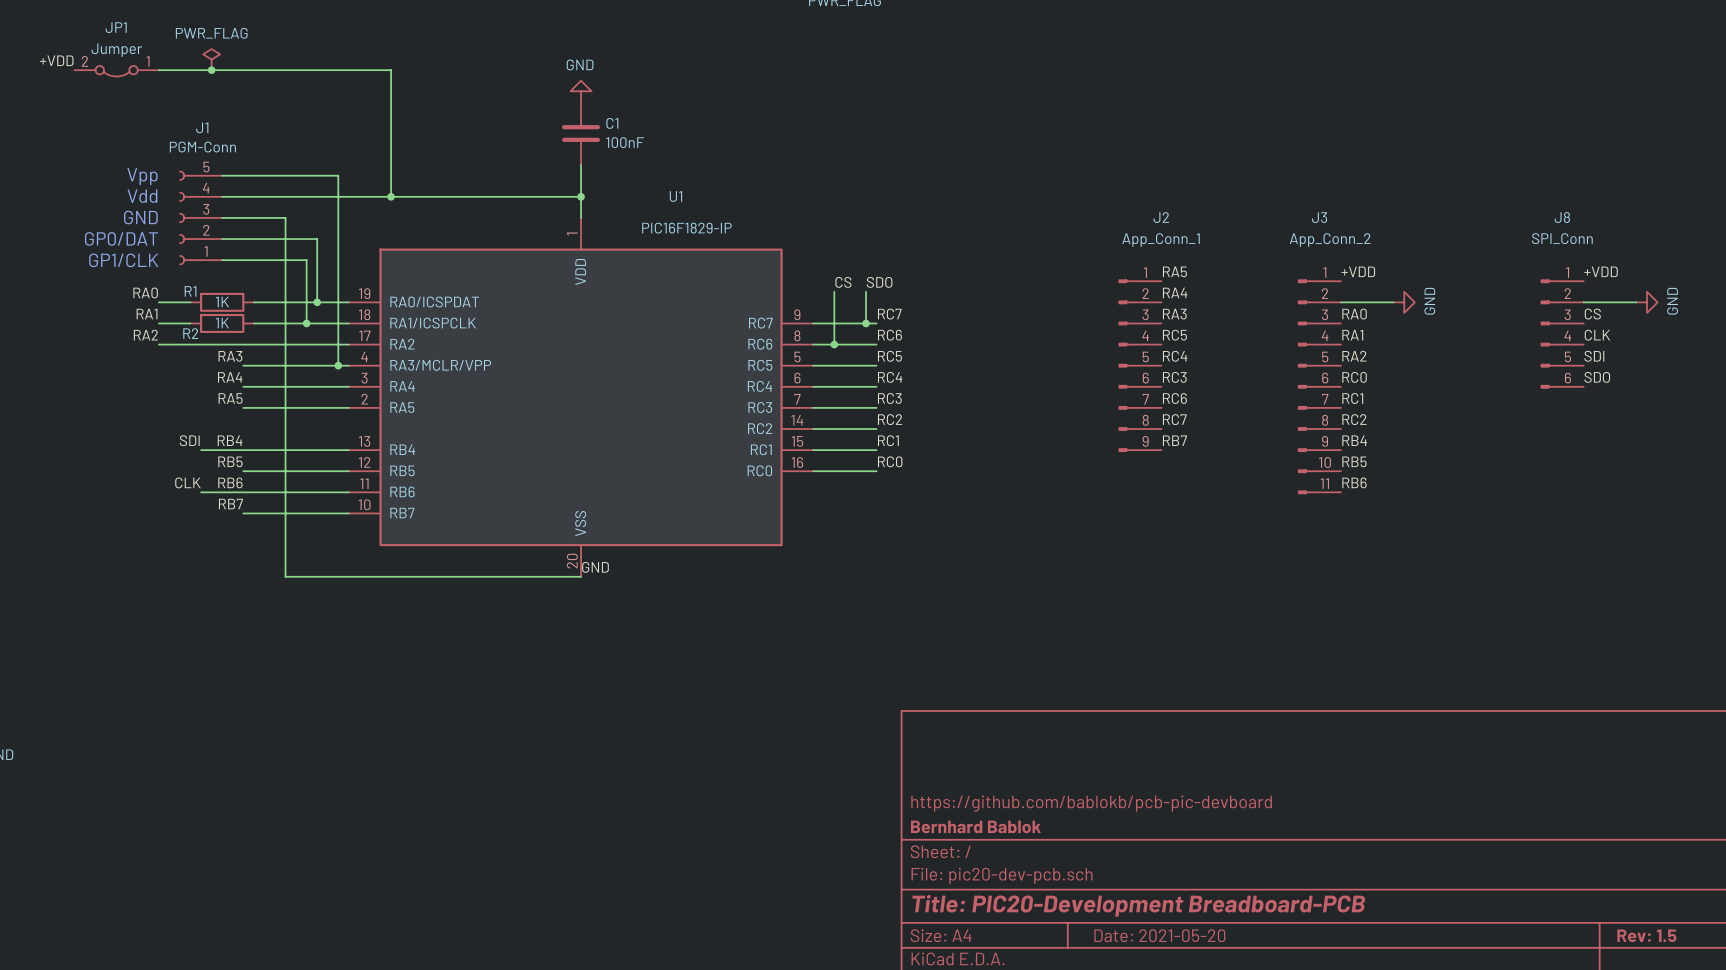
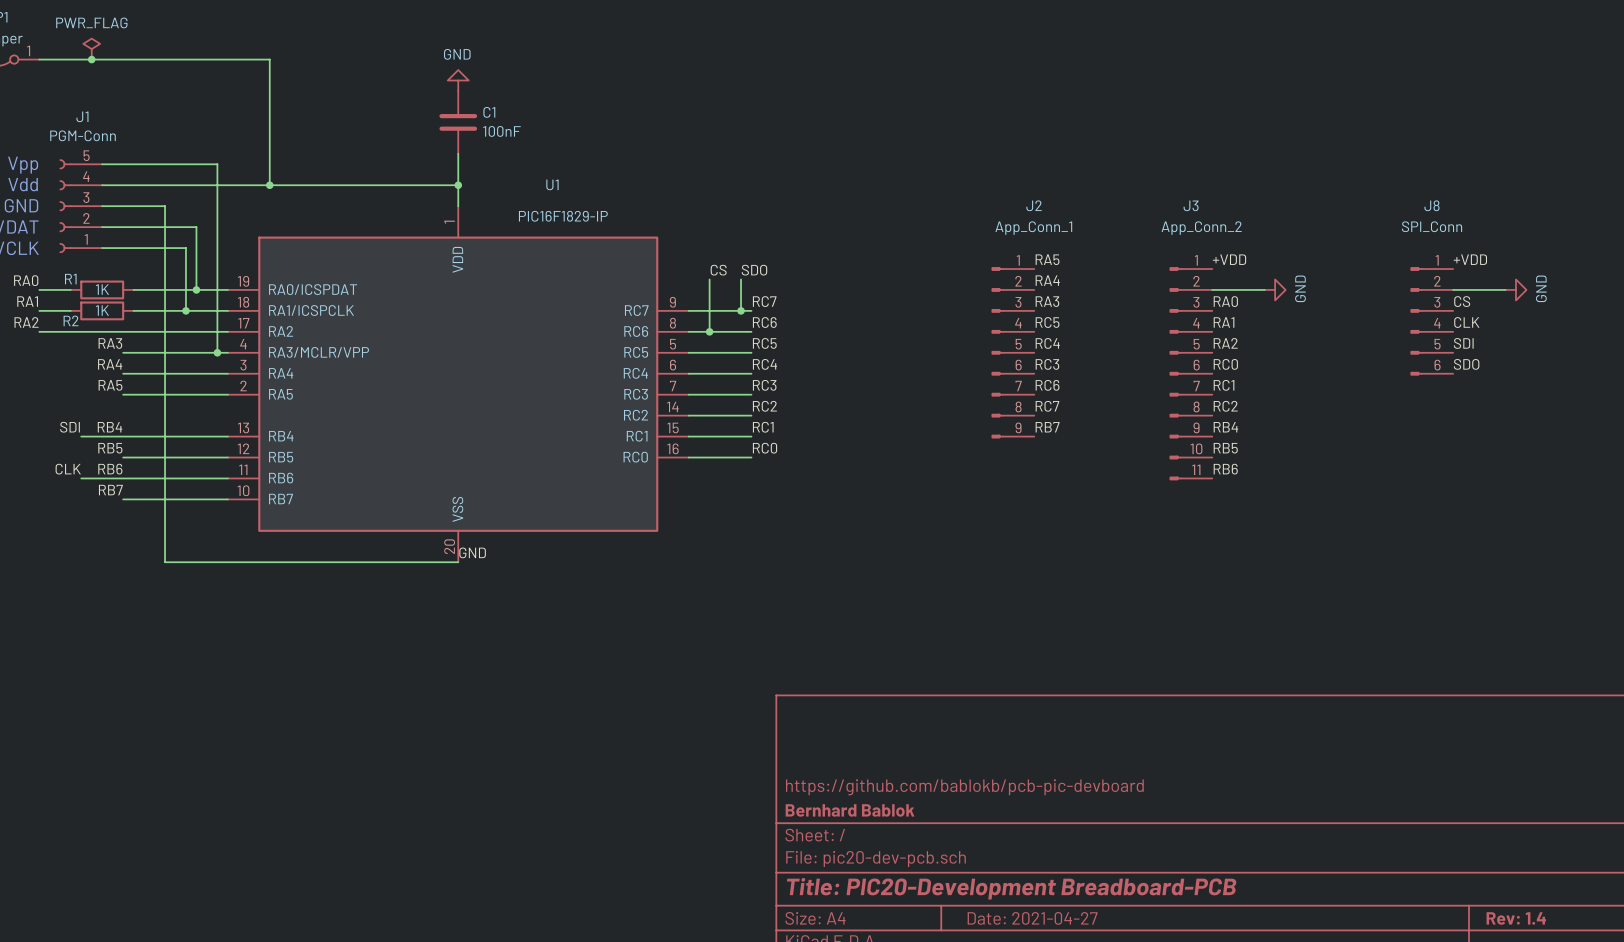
title block: Date: 2021-05-20 (1159, 935) -> Date: 2021-04-27 (1032, 918)
title block: Rev: 1.5 (1646, 935) -> Rev: 1.4 (1516, 918)

